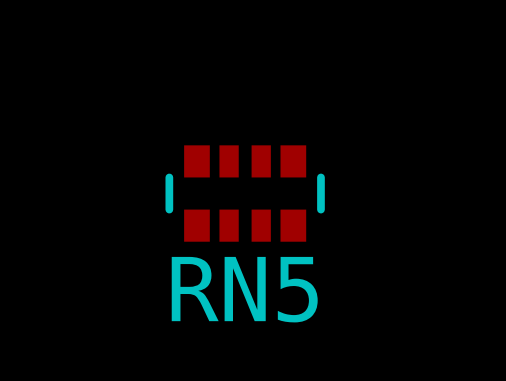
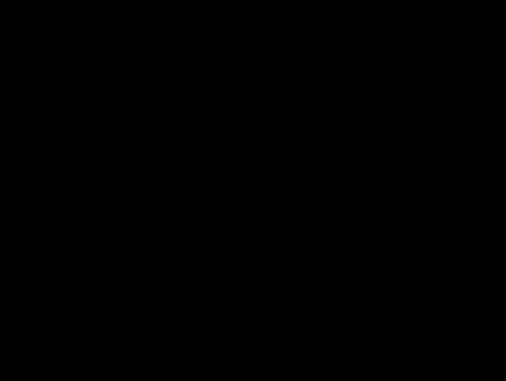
RN5: (245, 193) -> none

